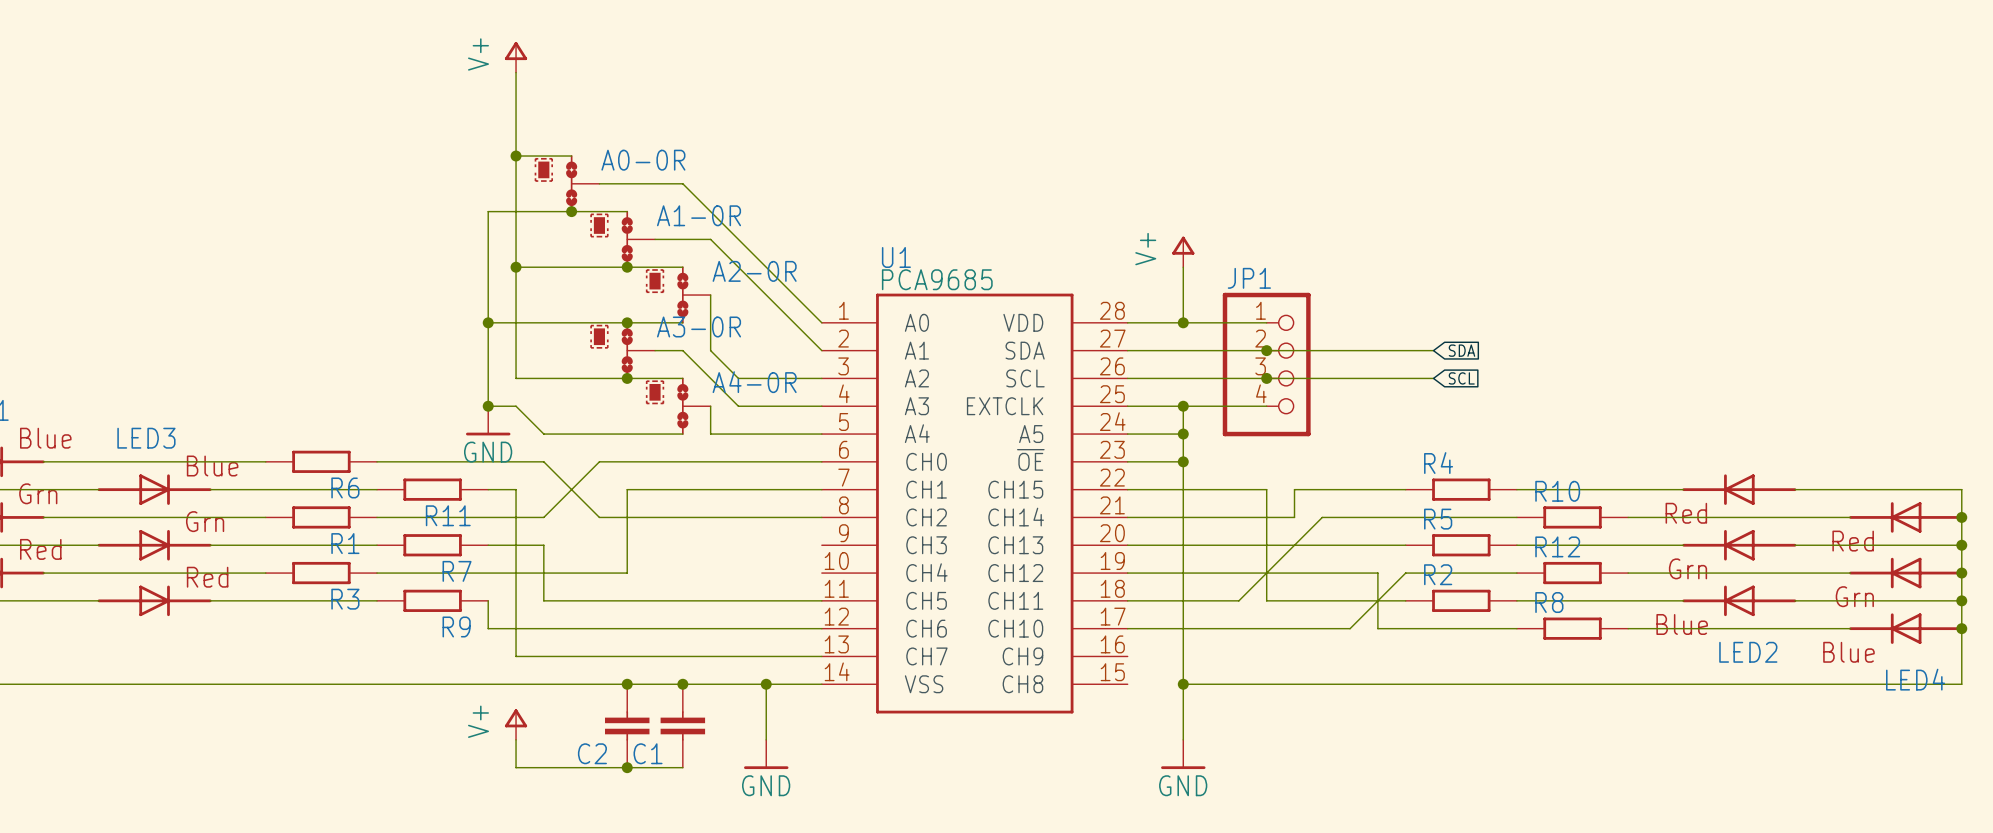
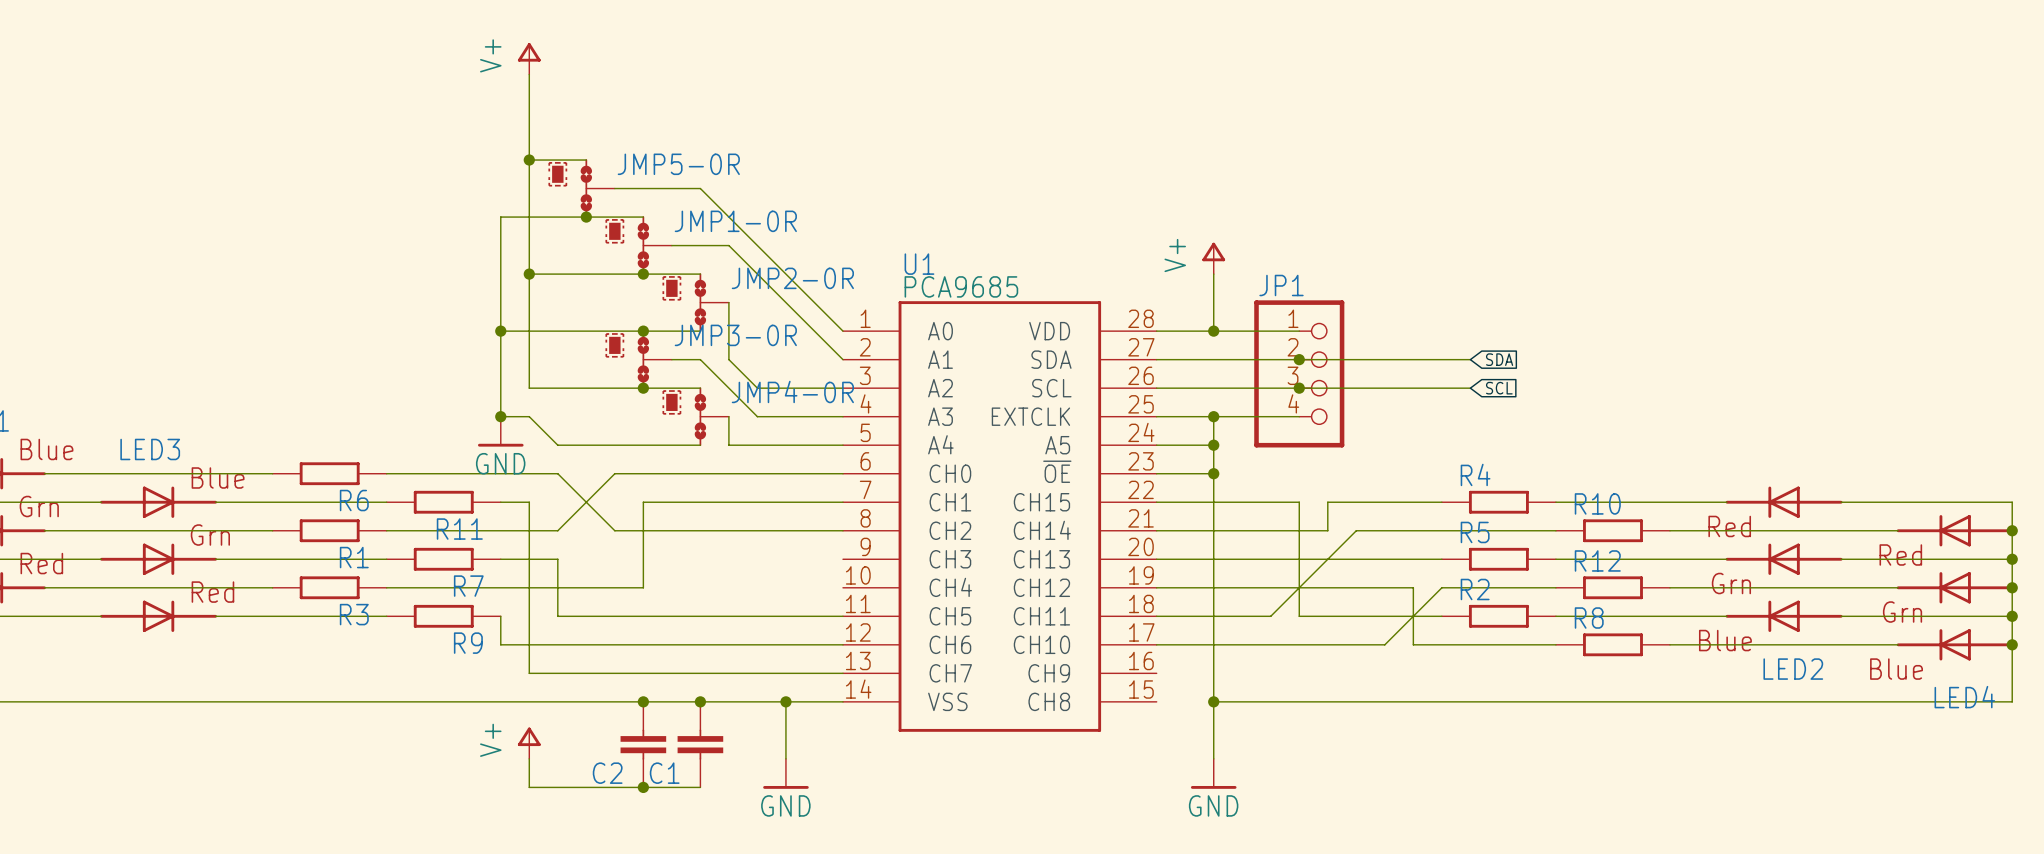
A0-0R name: A0-0R (643, 160) -> JMP5-0R (678, 164)
A1-0R name: A1-0R (699, 215) -> JMP1-0R (735, 221)
A2-0R name: A2-0R (754, 271) -> JMP2-0R (792, 278)
A3-0R name: A3-0R (699, 326) -> JMP3-0R (735, 335)
A4-0R name: A4-0R (754, 382) -> JMP4-0R (792, 391)

